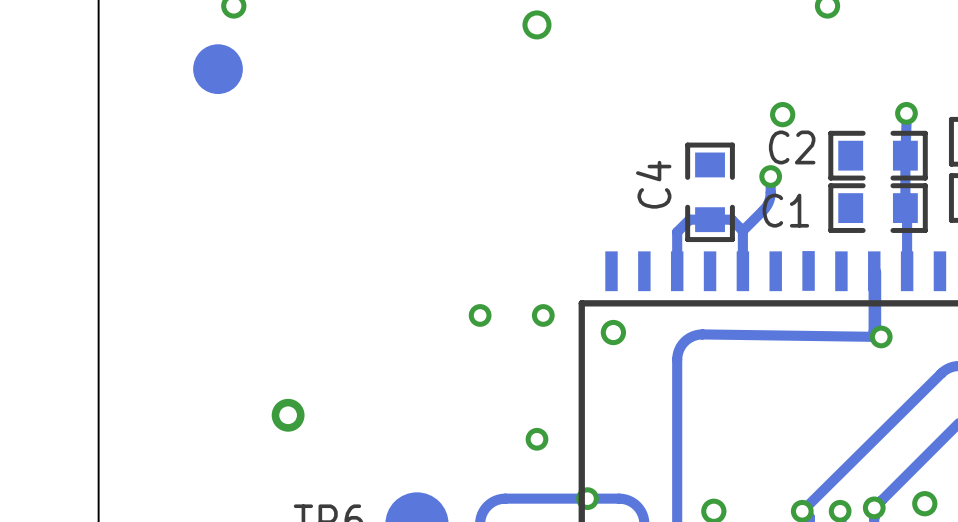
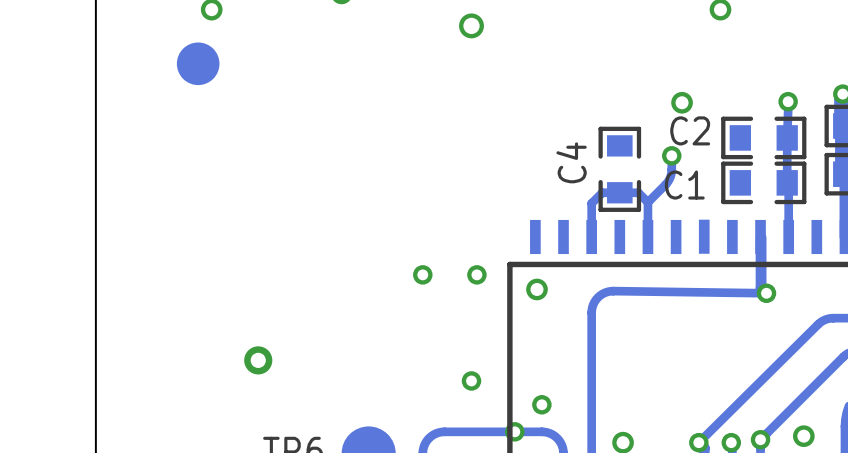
via: none -> (541, 404)

